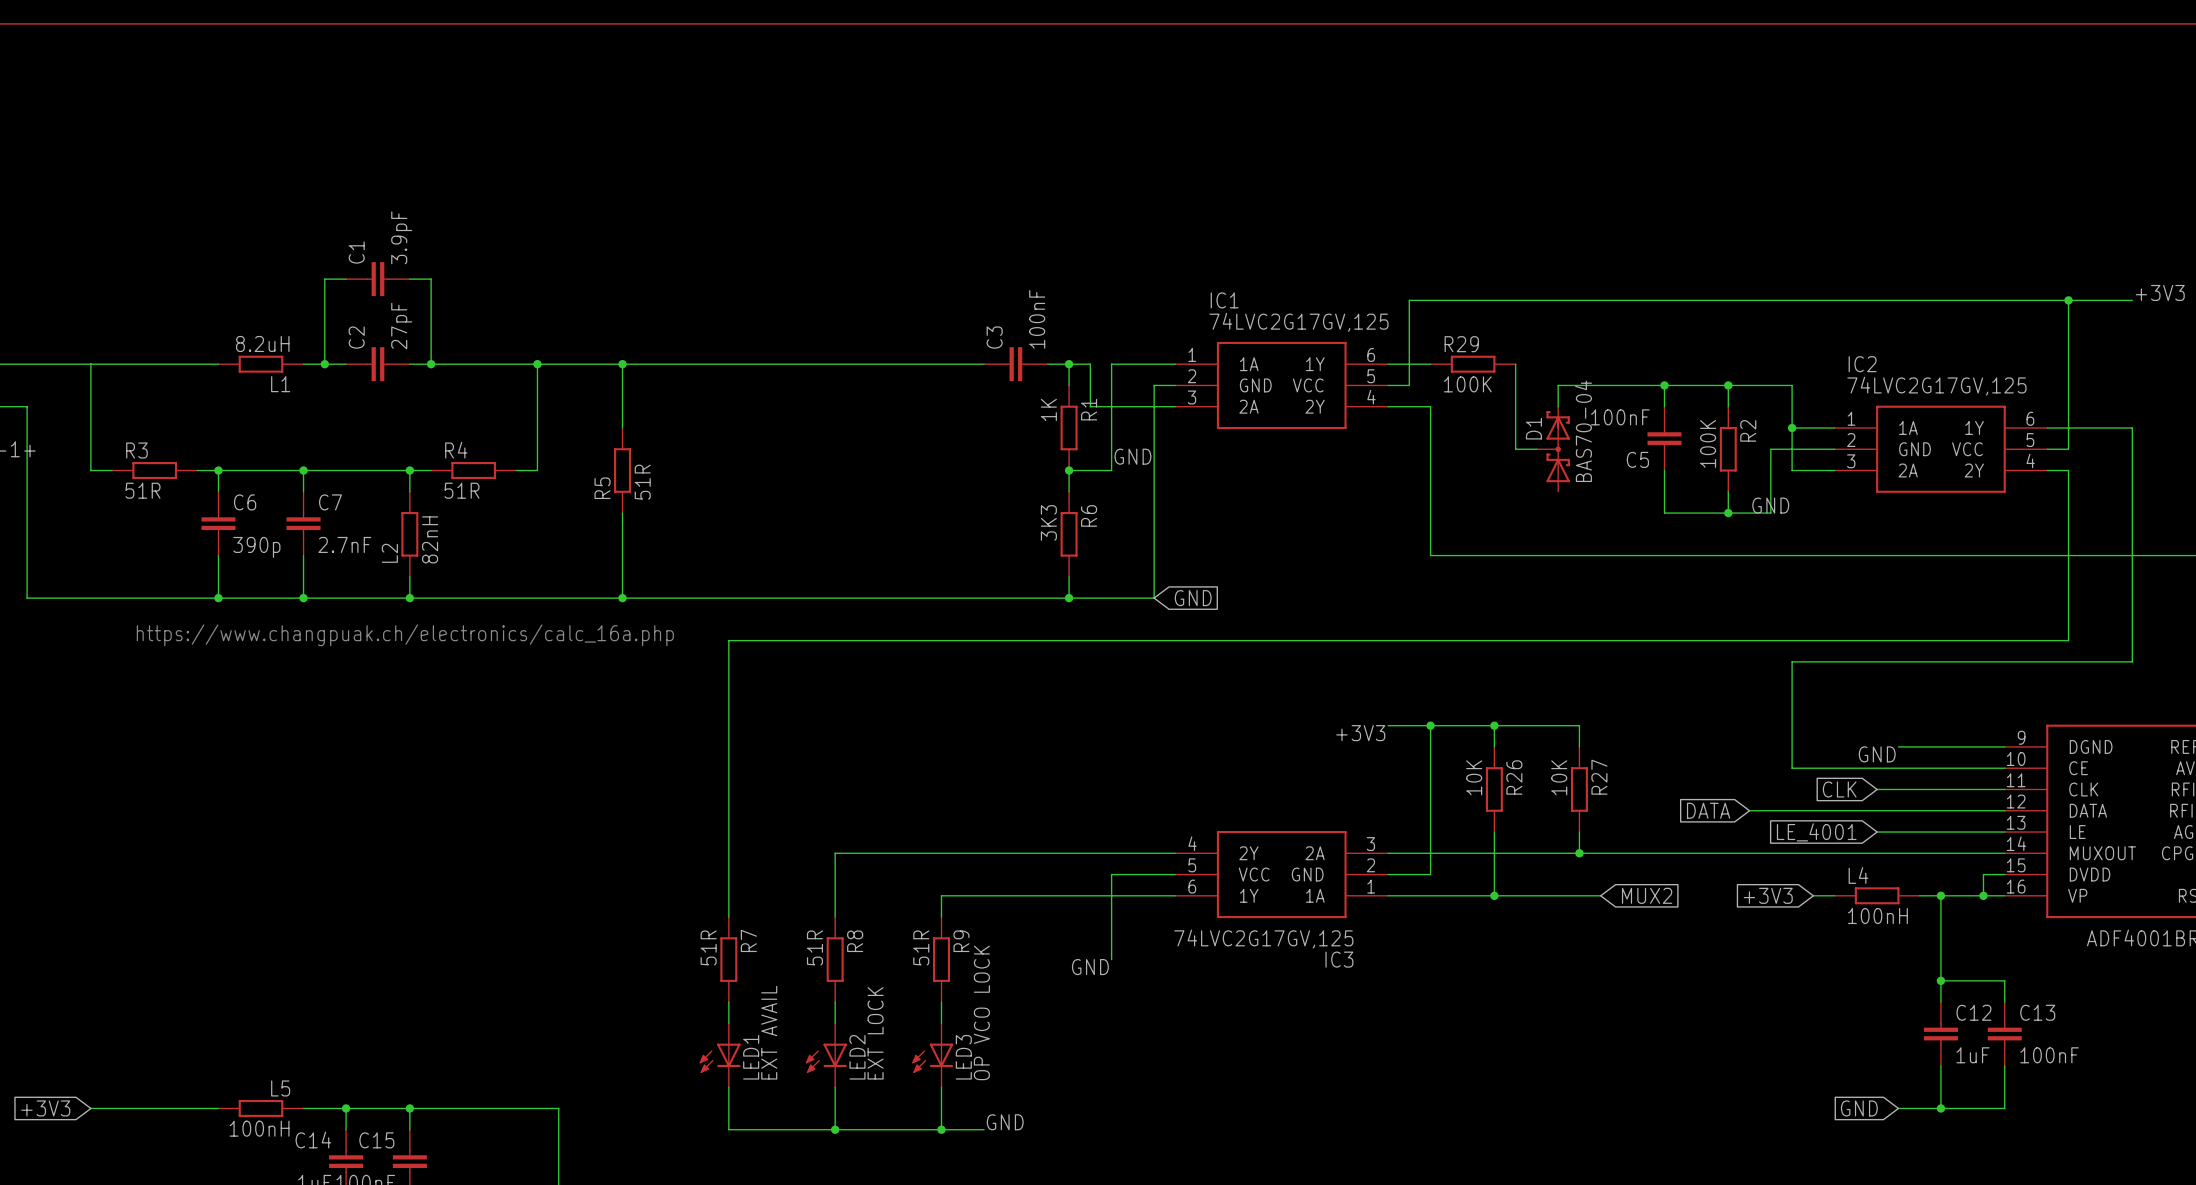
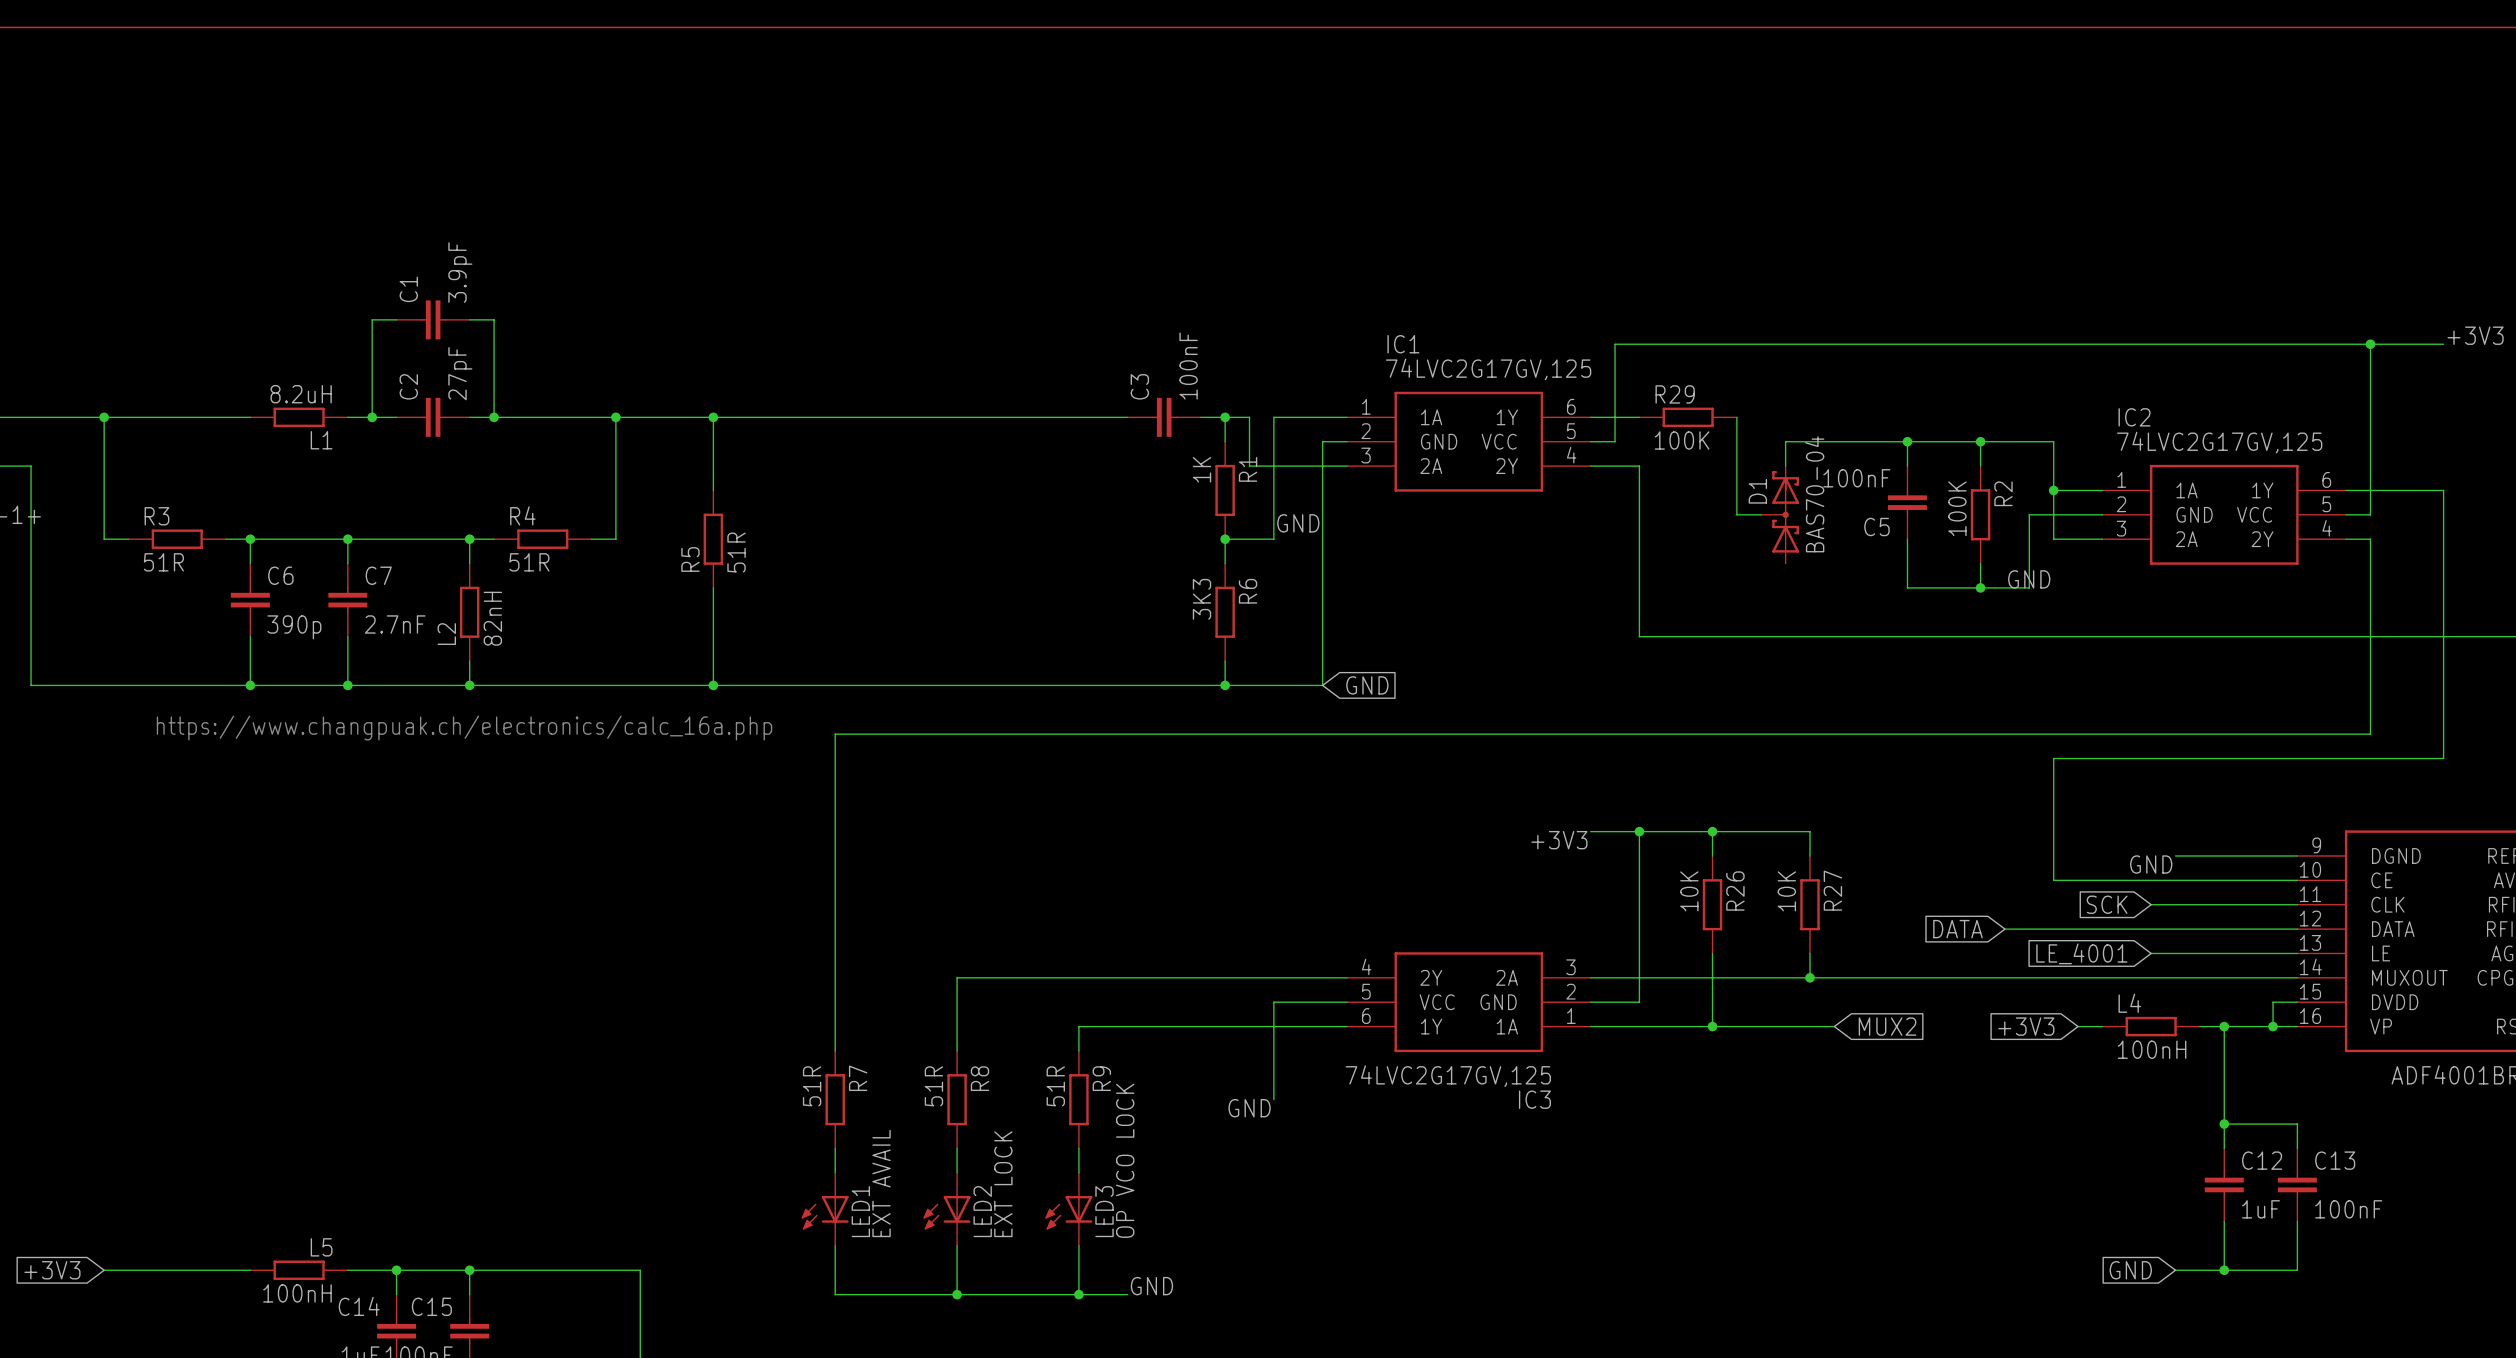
junction: none -> (104, 417)
global label: CLK (1839, 789) -> SCK (2107, 904)

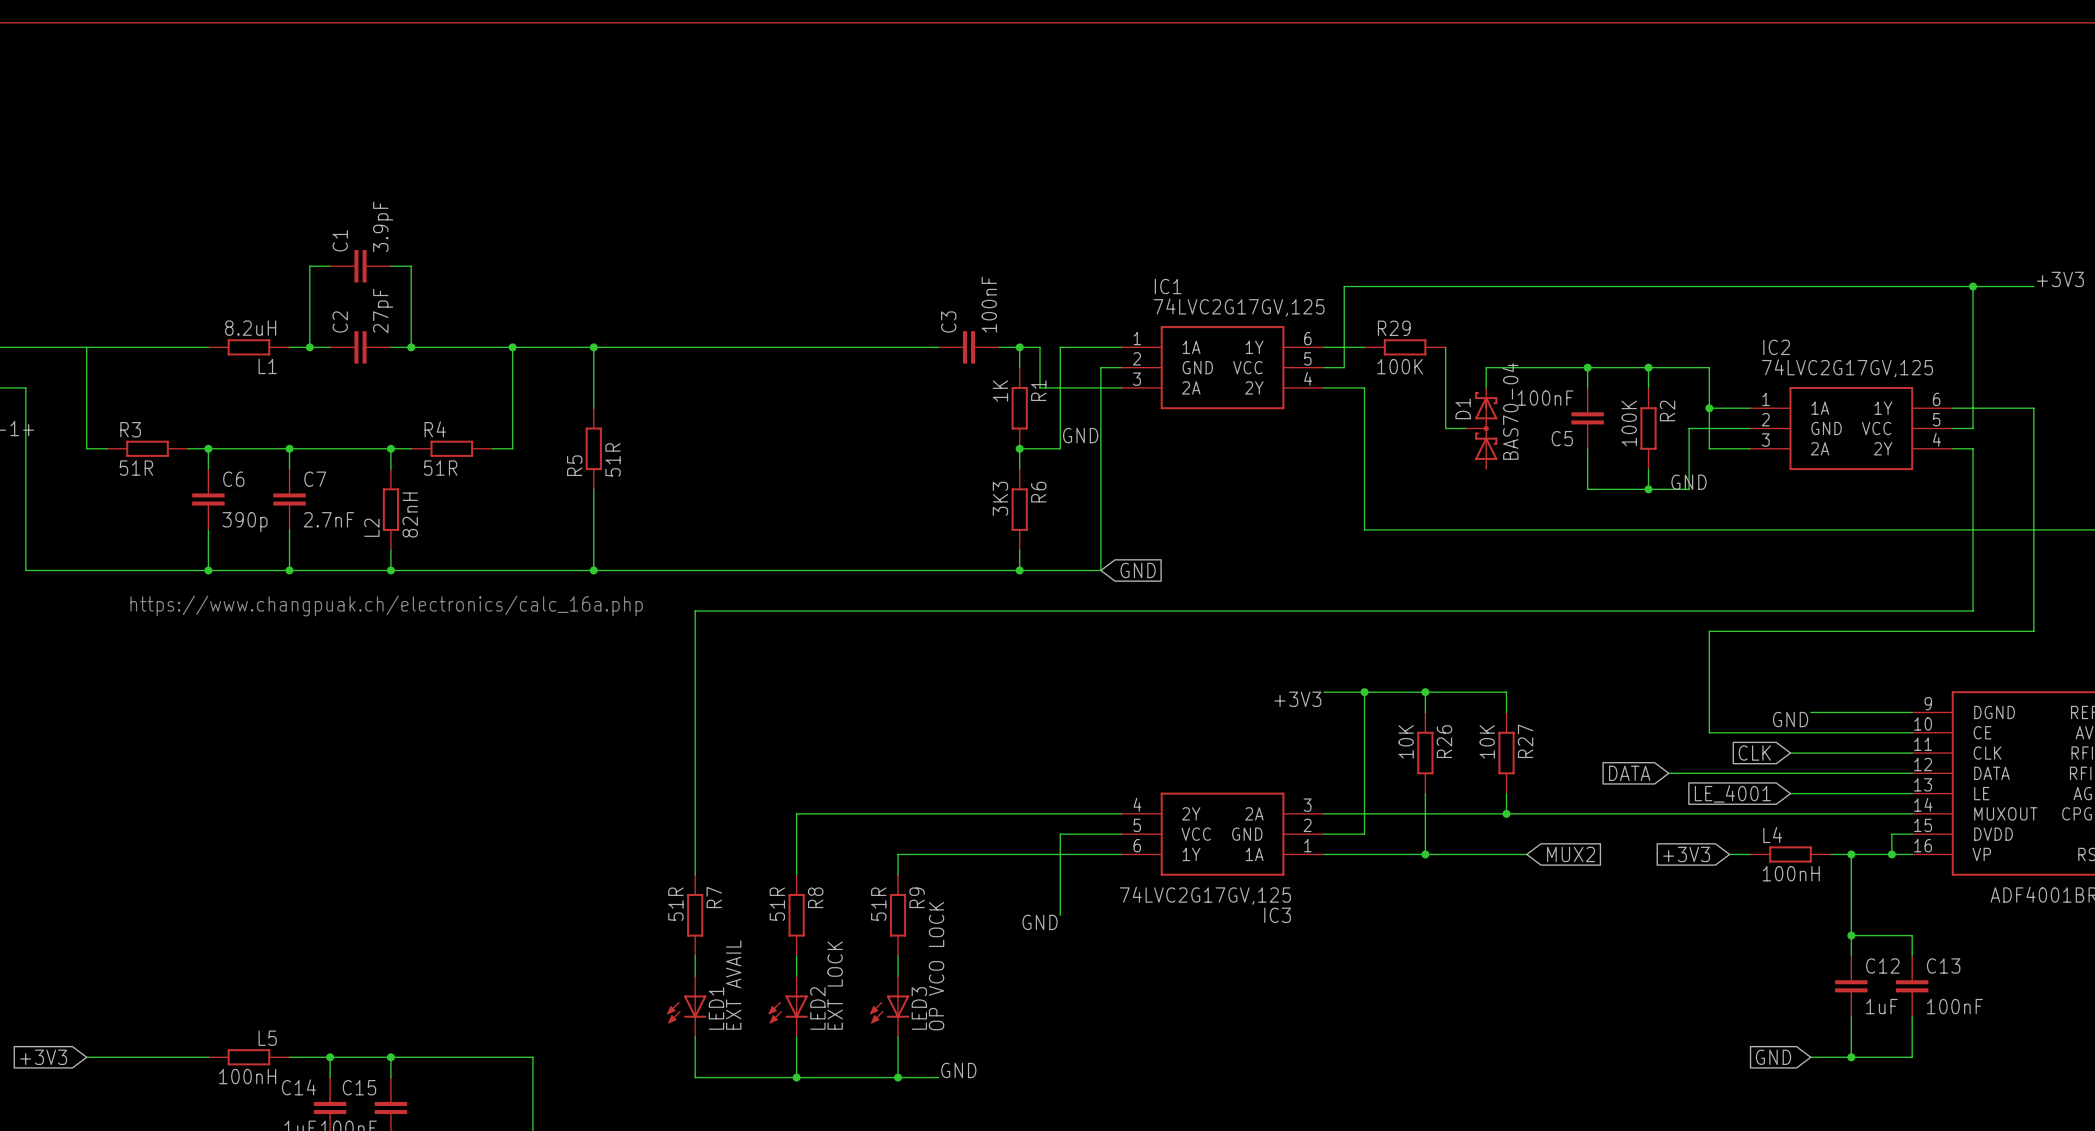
junction: (104, 417) -> none
global label: SCK (2107, 904) -> CLK (1754, 753)

